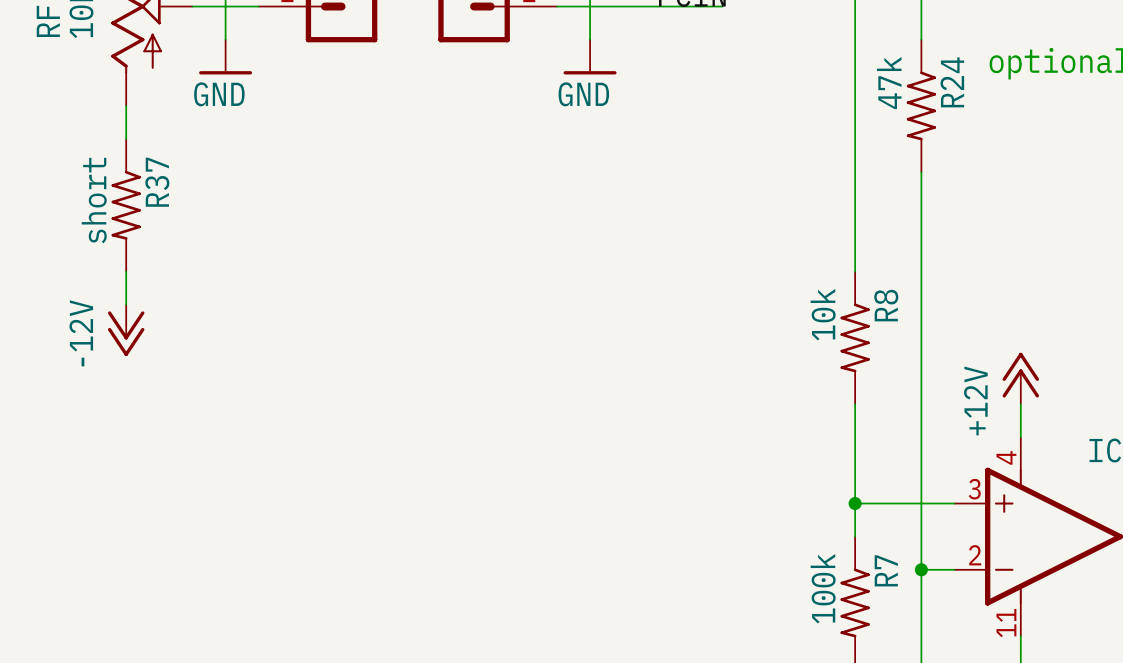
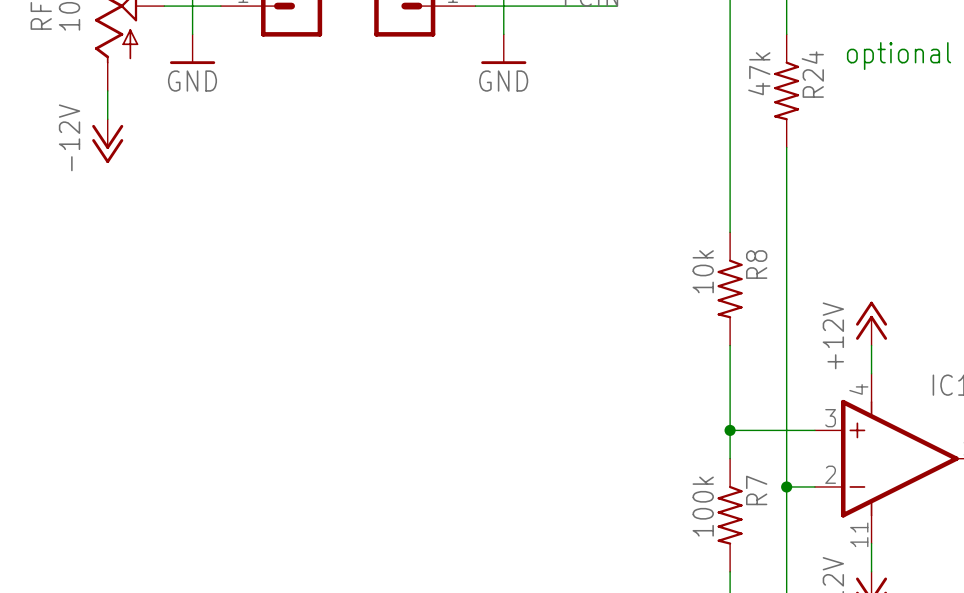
R37: short (126, 205) -> none
wire: (126, 271) (126, 304) -> none
power symbol position: -12V (126, 330) -> -12V (107, 141)

